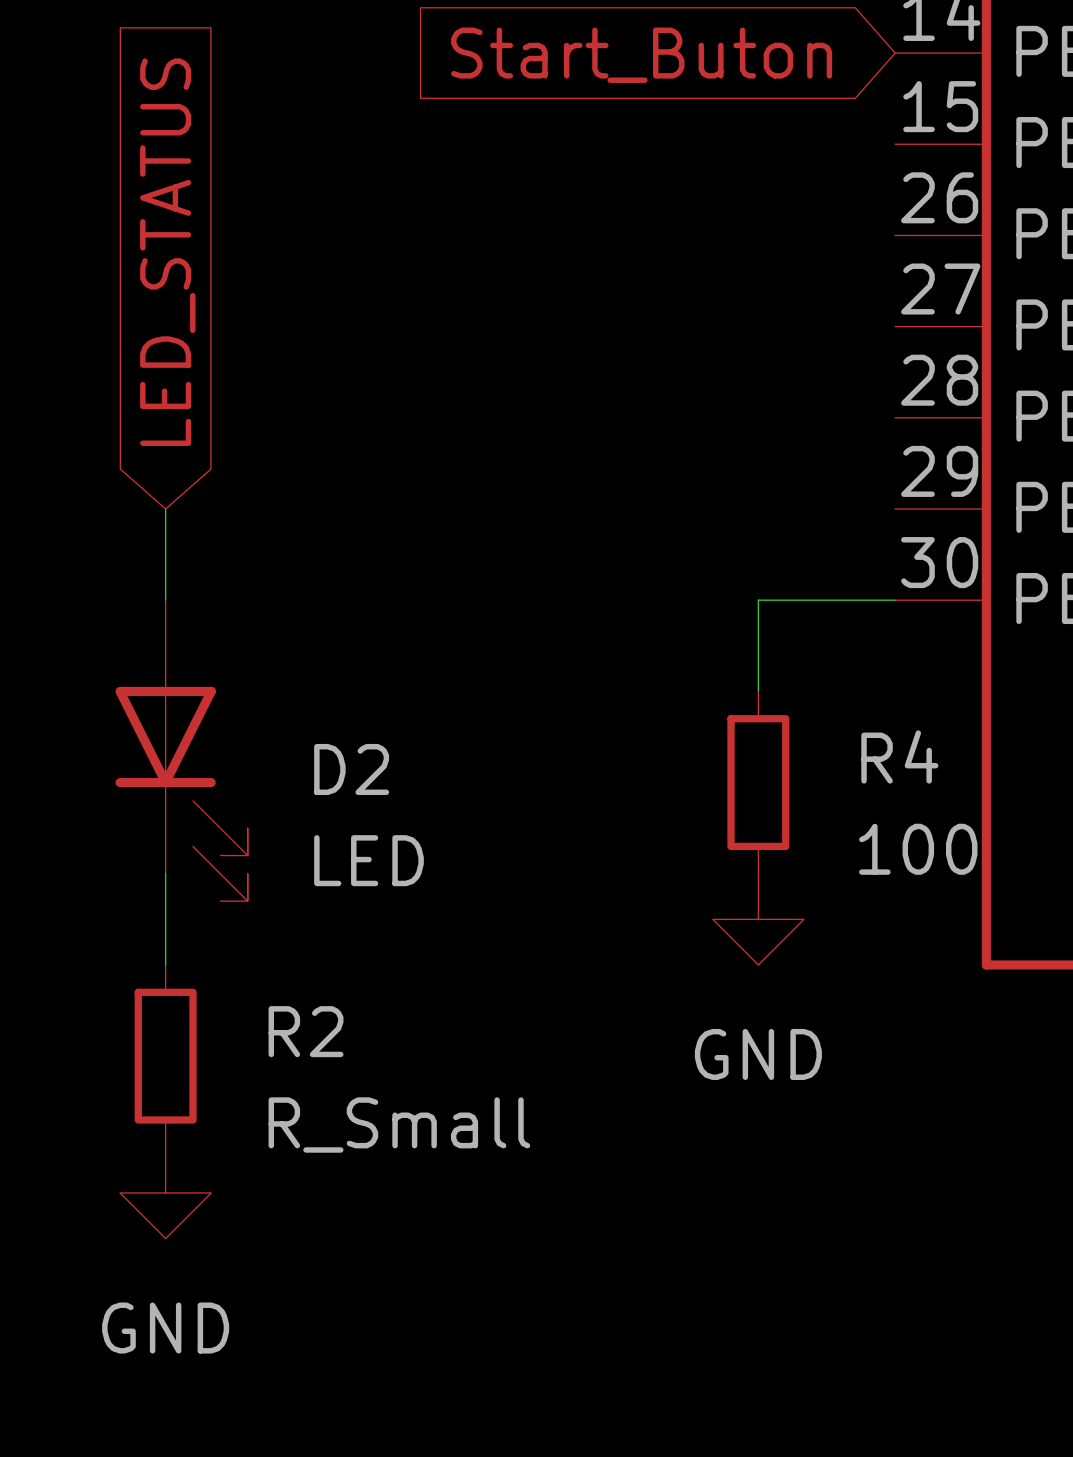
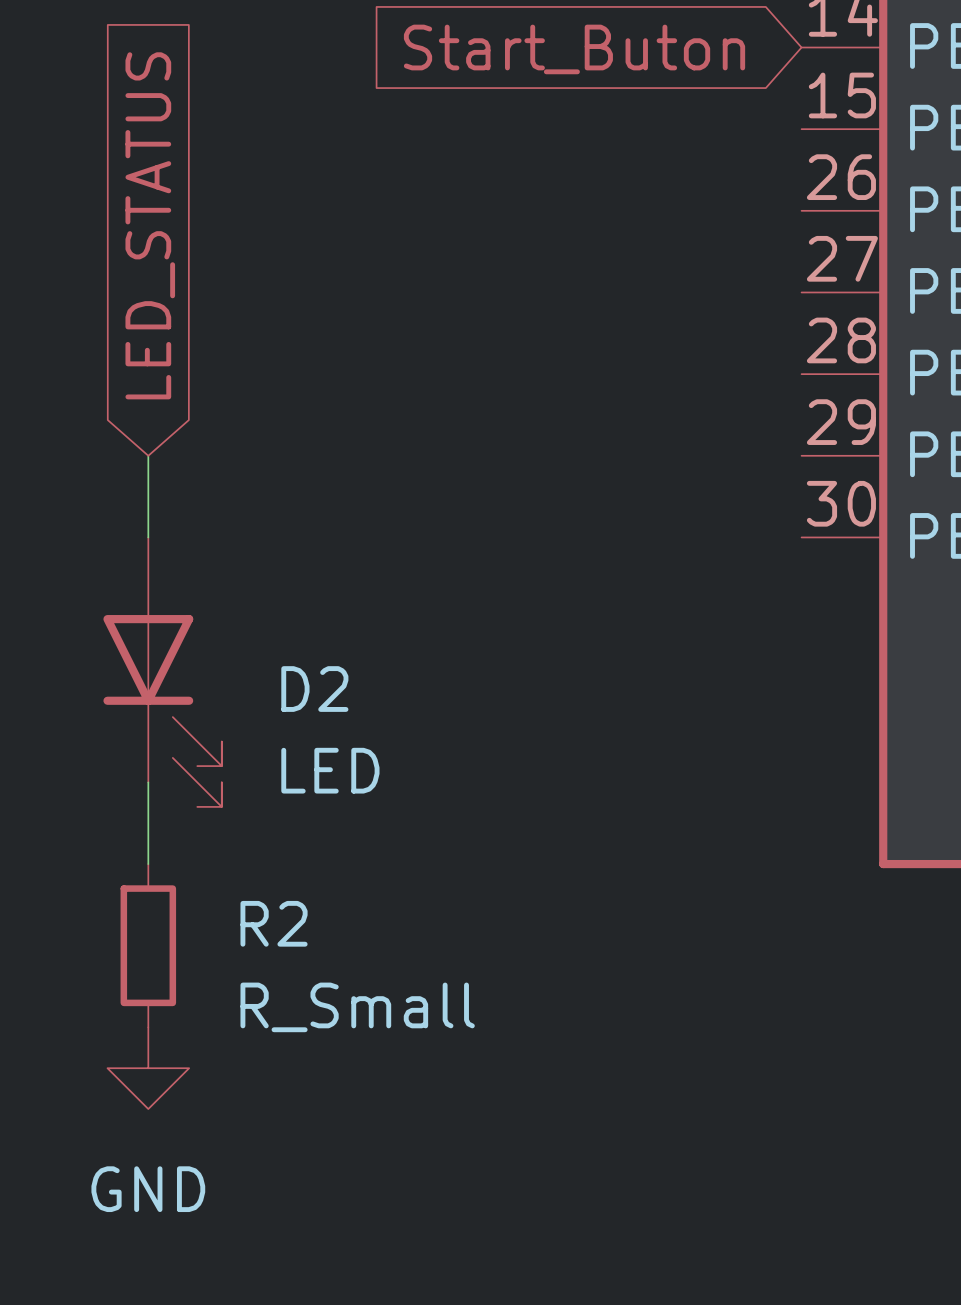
wire: (895, 600) (758, 600) (758, 691) -> none
R4: 100 (758, 782) -> none
power symbol: GND (758, 919) -> none

